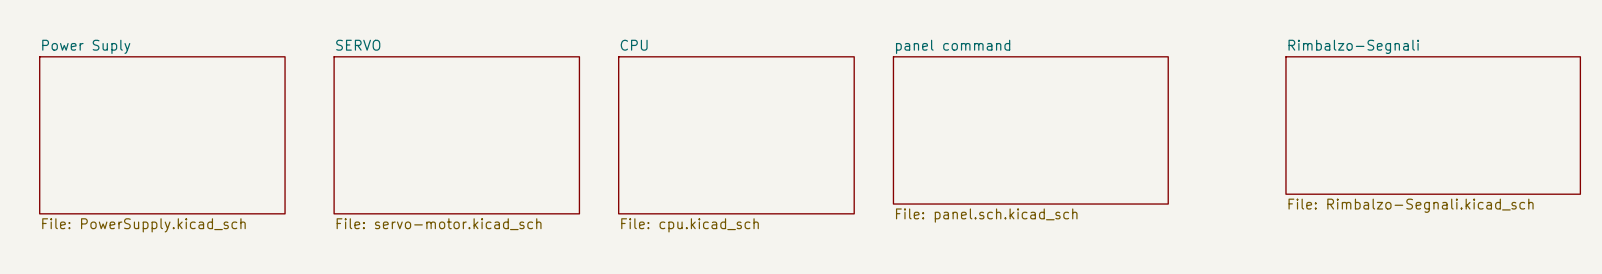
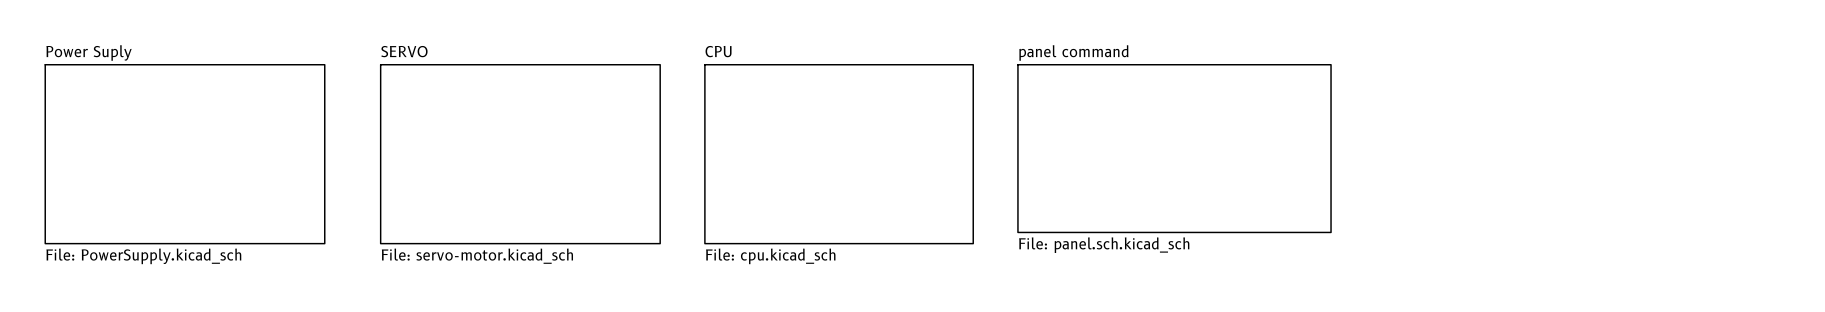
sheet Rimbalzo-Segnali: File: Rimbalzo-Segnali.kicad_sch (1433, 125) -> none

